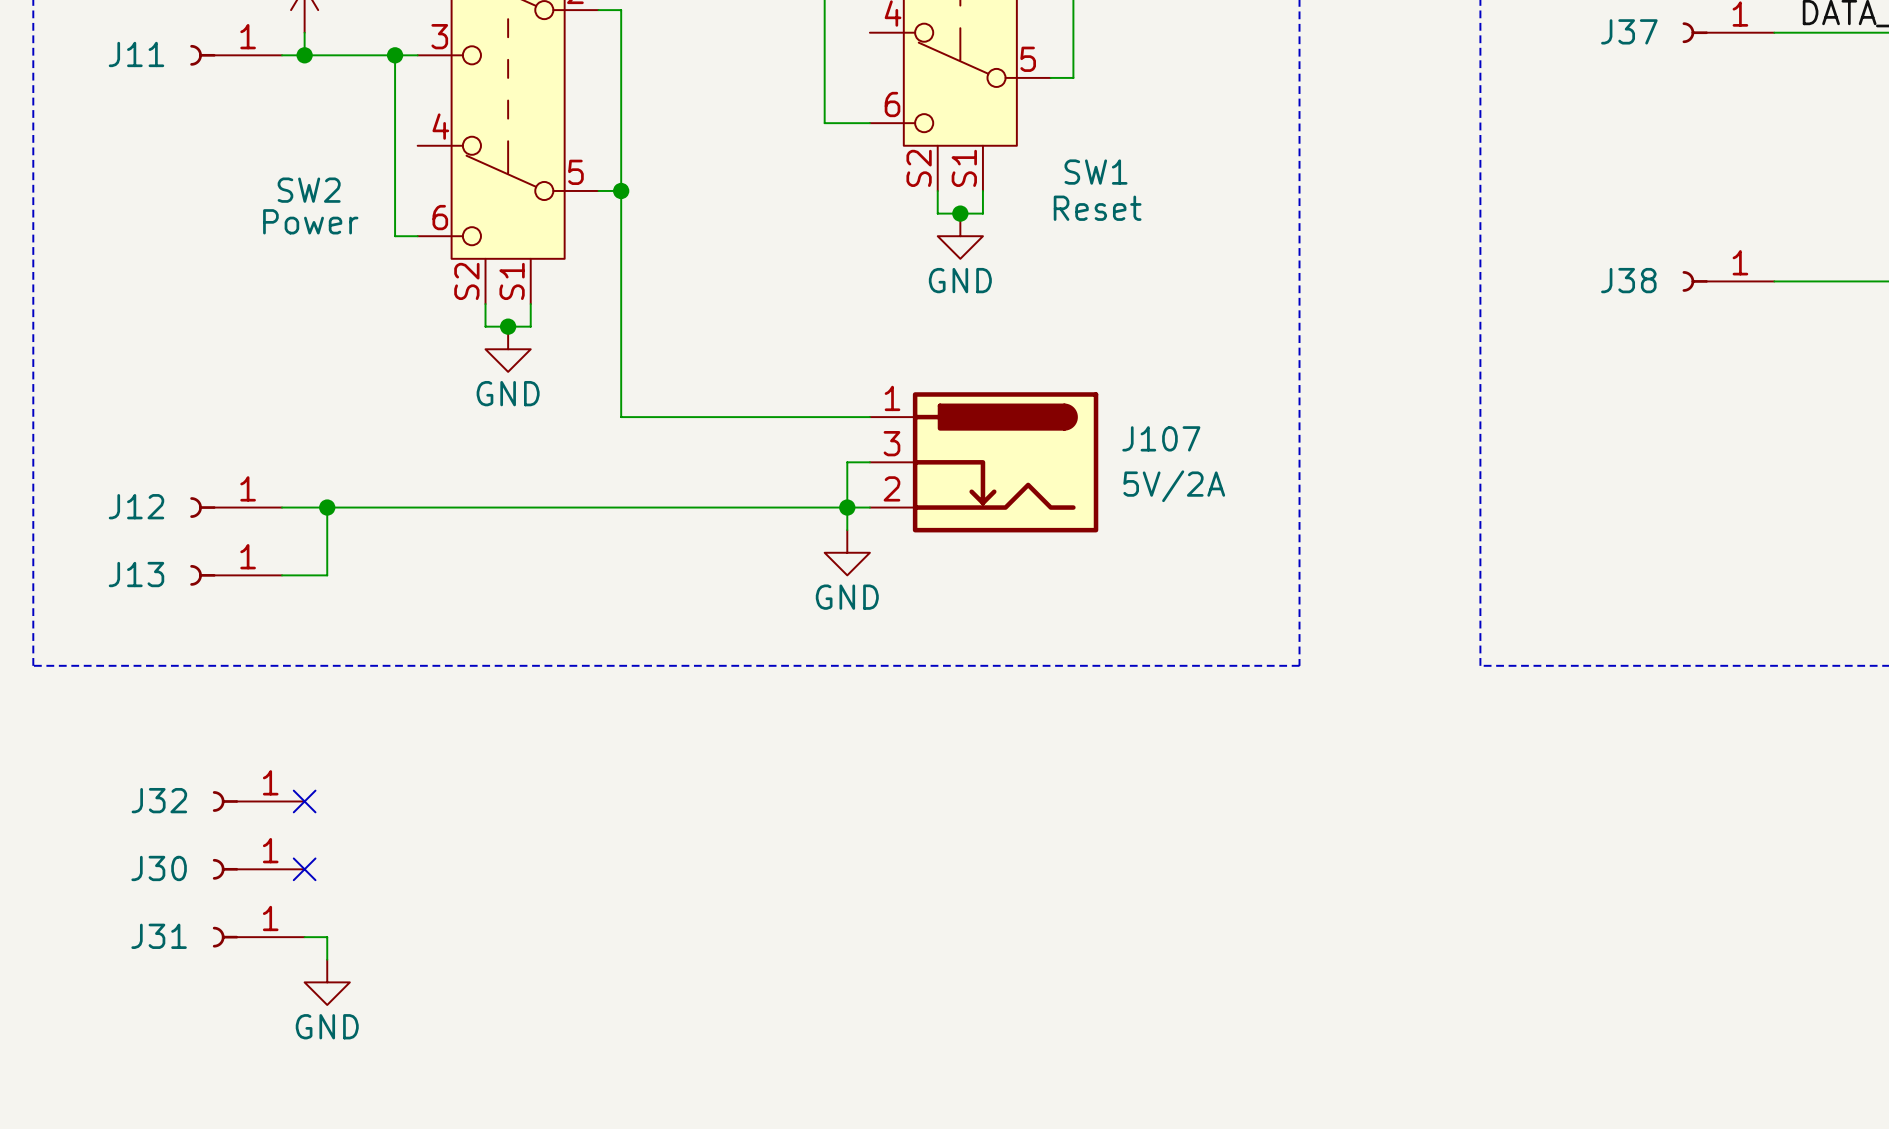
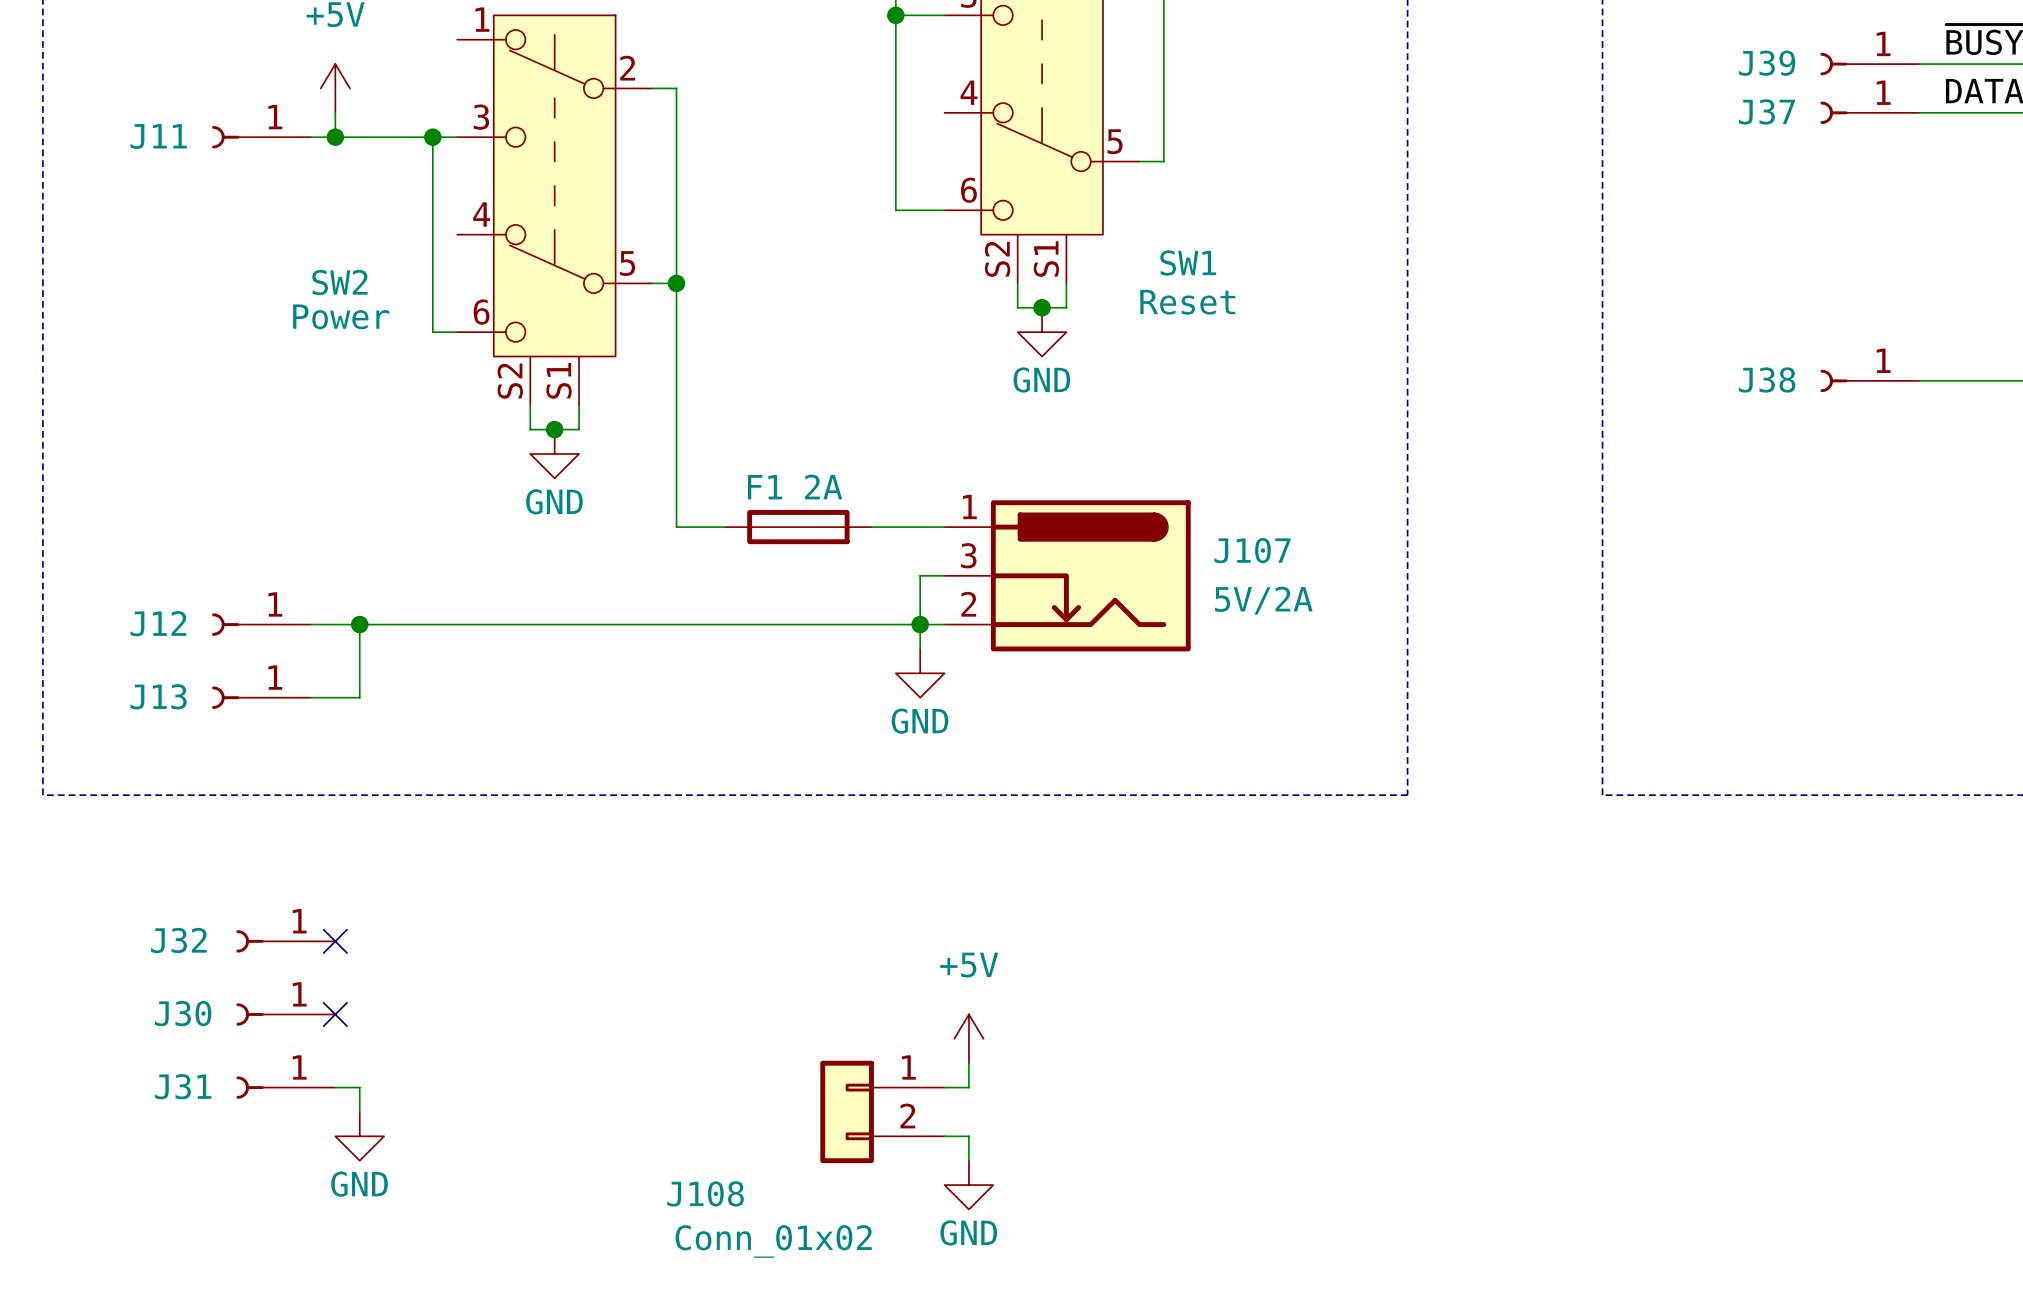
F1: none -> 2A (798, 527)
power symbol: none -> +5V (968, 1038)
wire: none -> (968, 1063) (968, 1087) (944, 1087)
J108: none -> Conn_01x02 (882, 1111)
wire: none -> (944, 1136) (968, 1136) (968, 1160)
power symbol: none -> GND (968, 1185)

